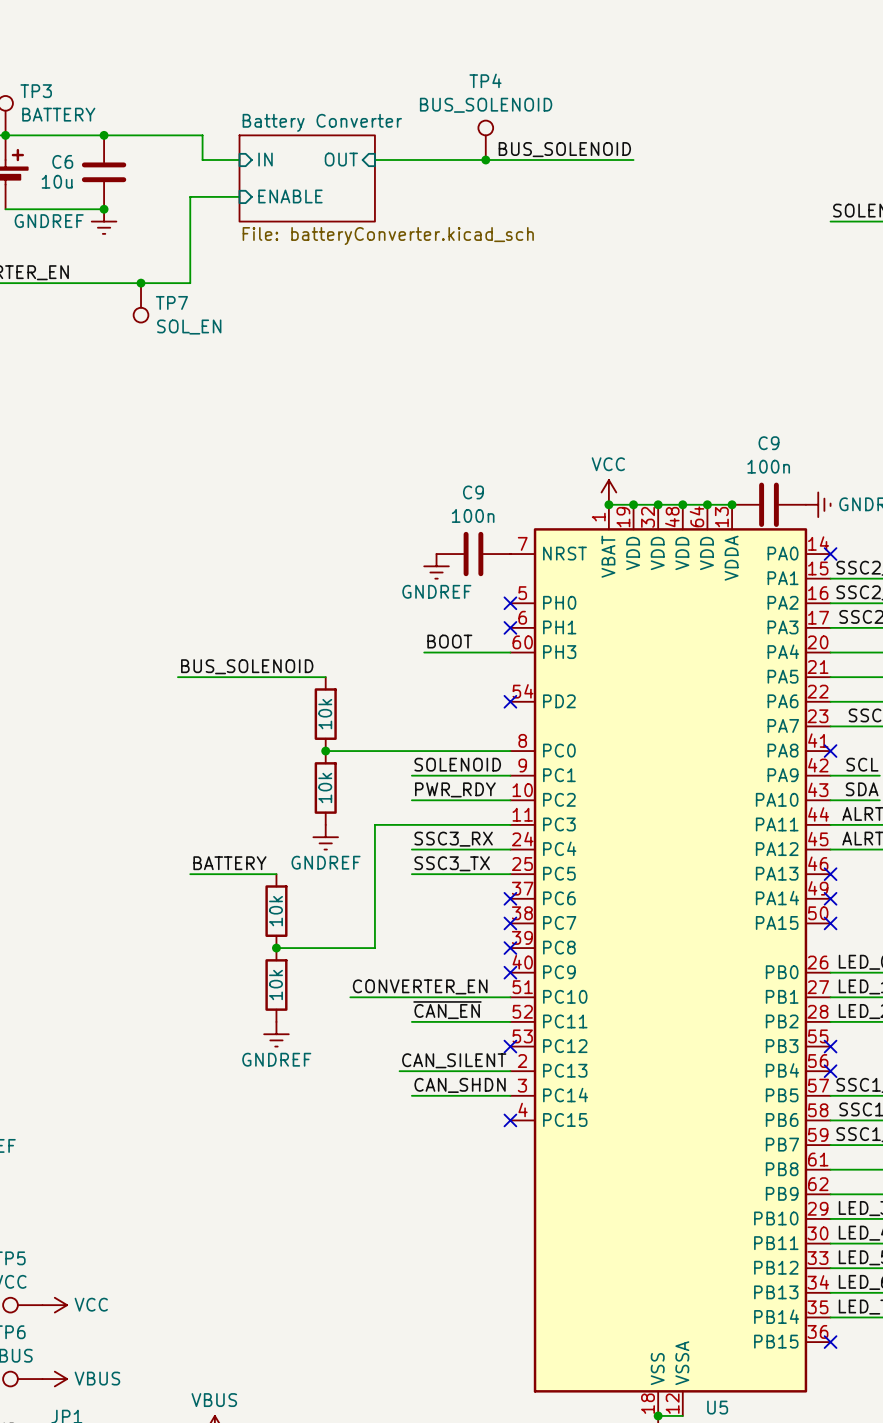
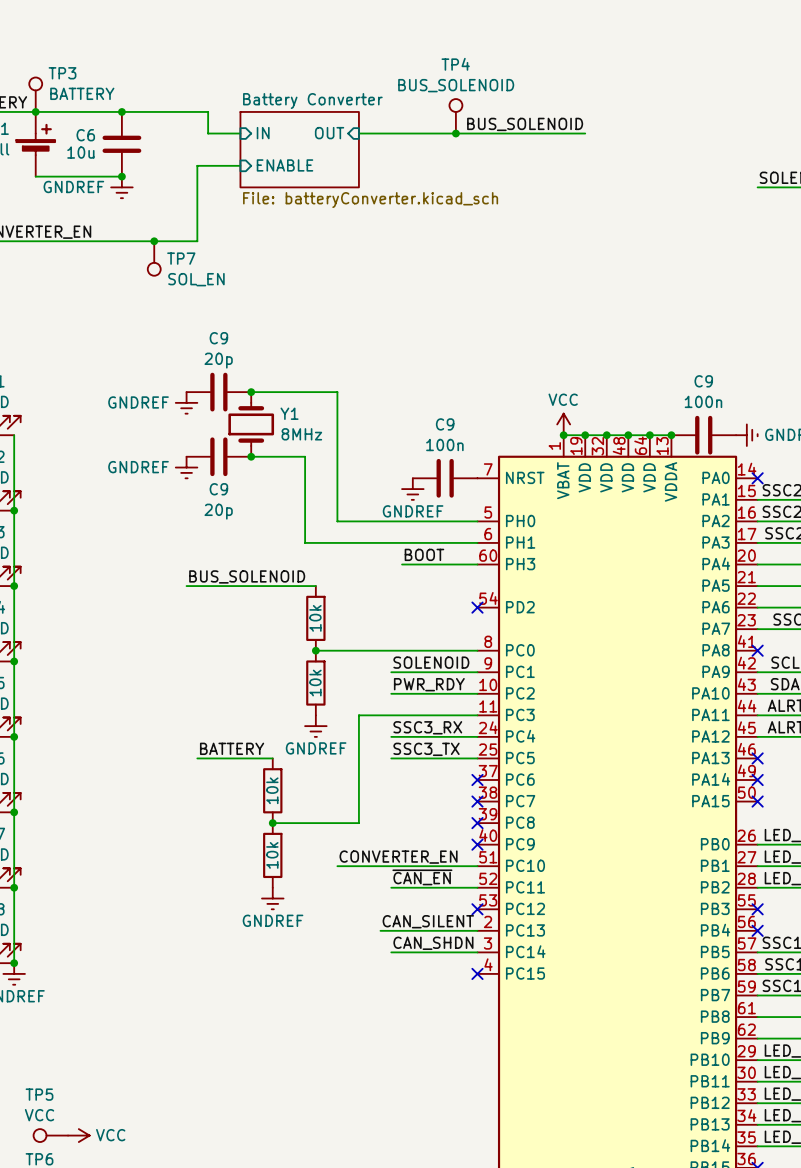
C9: none -> 20p (218, 392)
wire: none -> (251, 392) (337, 392) (337, 521) (477, 521)
junction: none -> (251, 392)
power symbol: none -> GNDREF (186, 402)
Y1: none -> 8MHz (251, 424)
C9: none -> 20p (218, 456)
wire: none -> (251, 456) (305, 456) (305, 542) (477, 542)
junction: none -> (251, 456)
power symbol: none -> GNDREF (186, 467)
no-connect mark: (510, 603) -> none
no-connect mark: (510, 627) -> none

